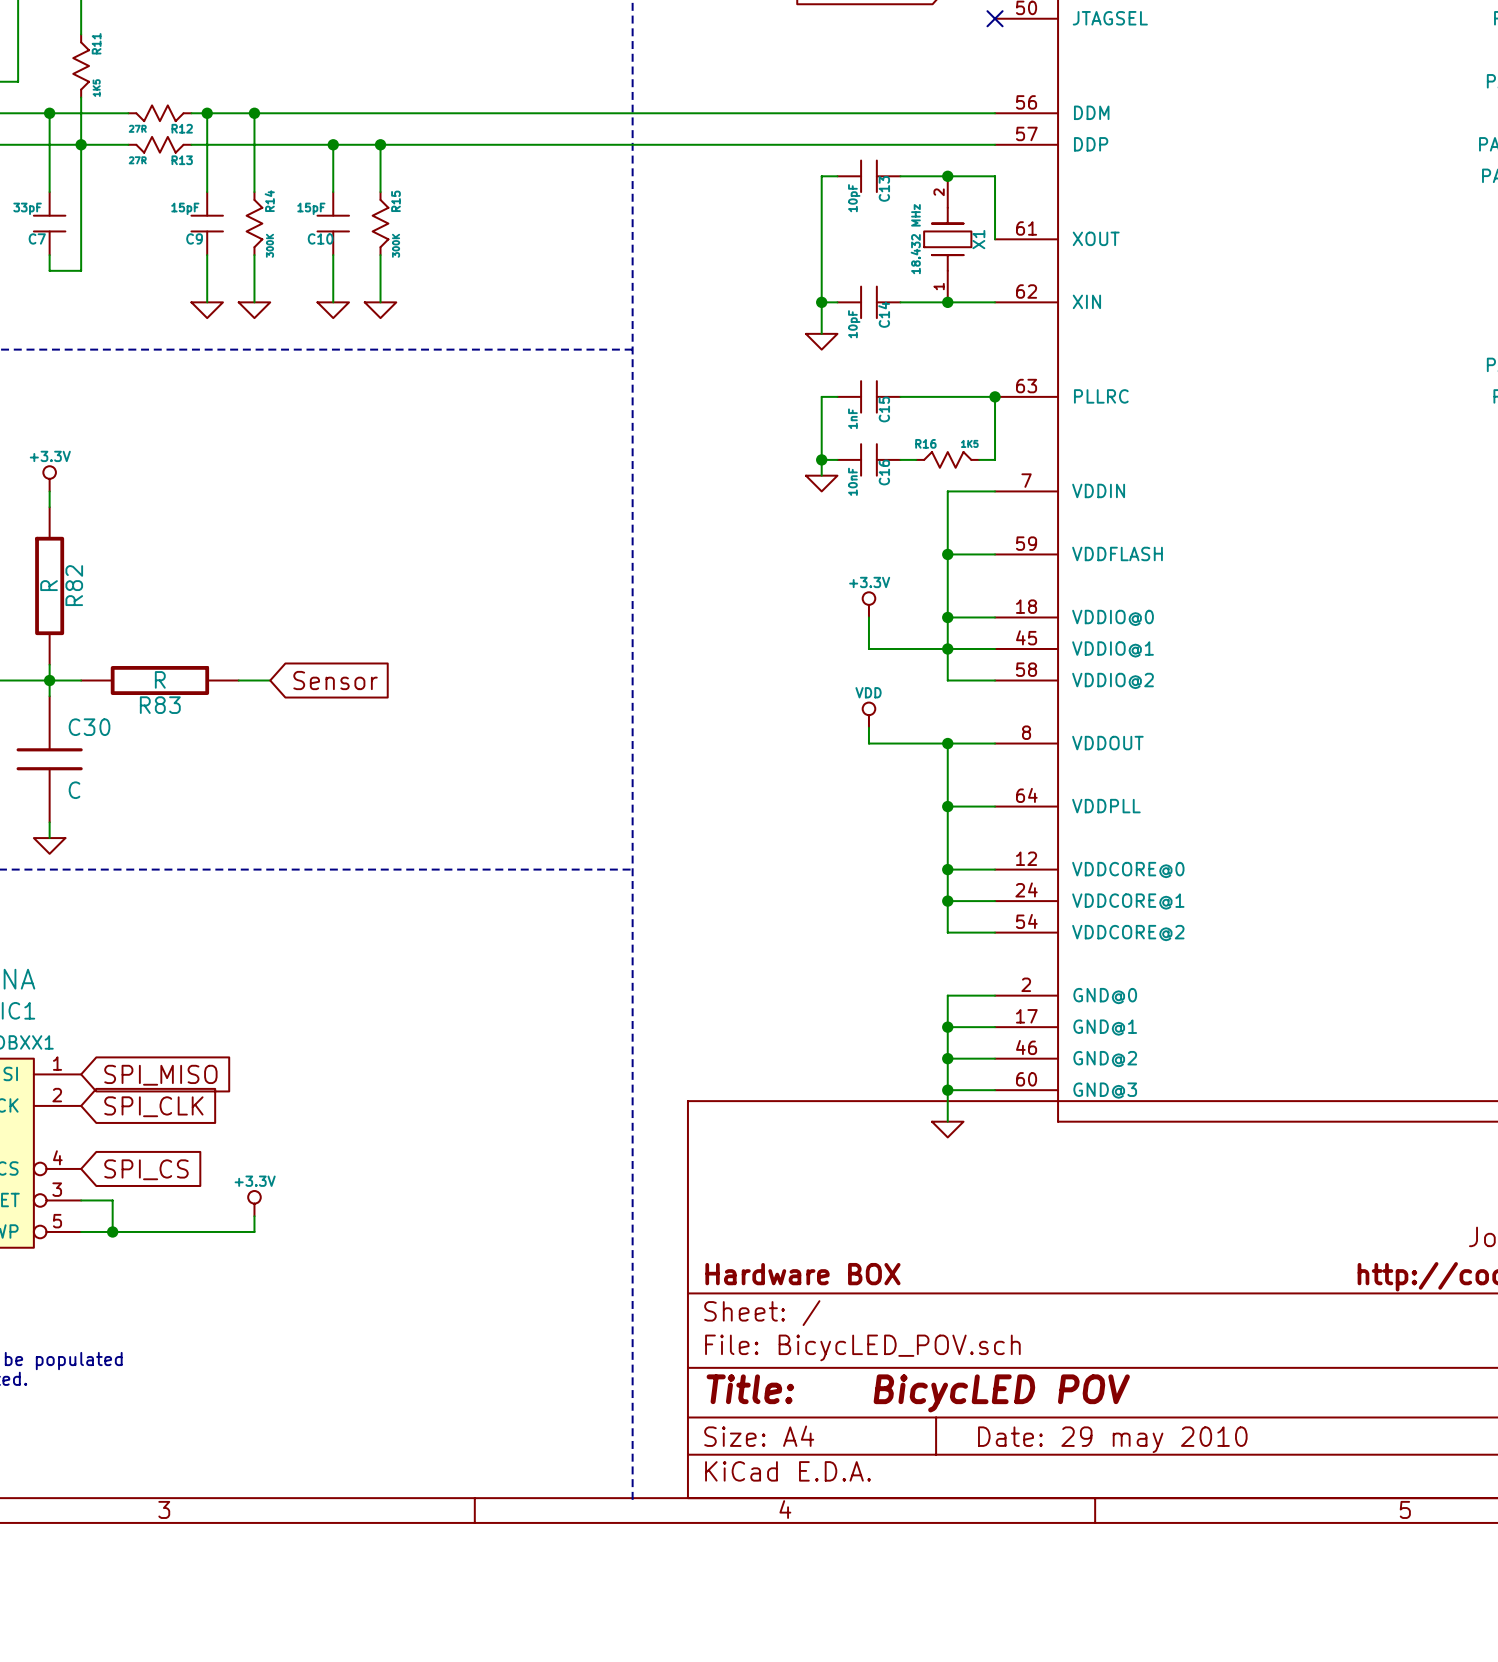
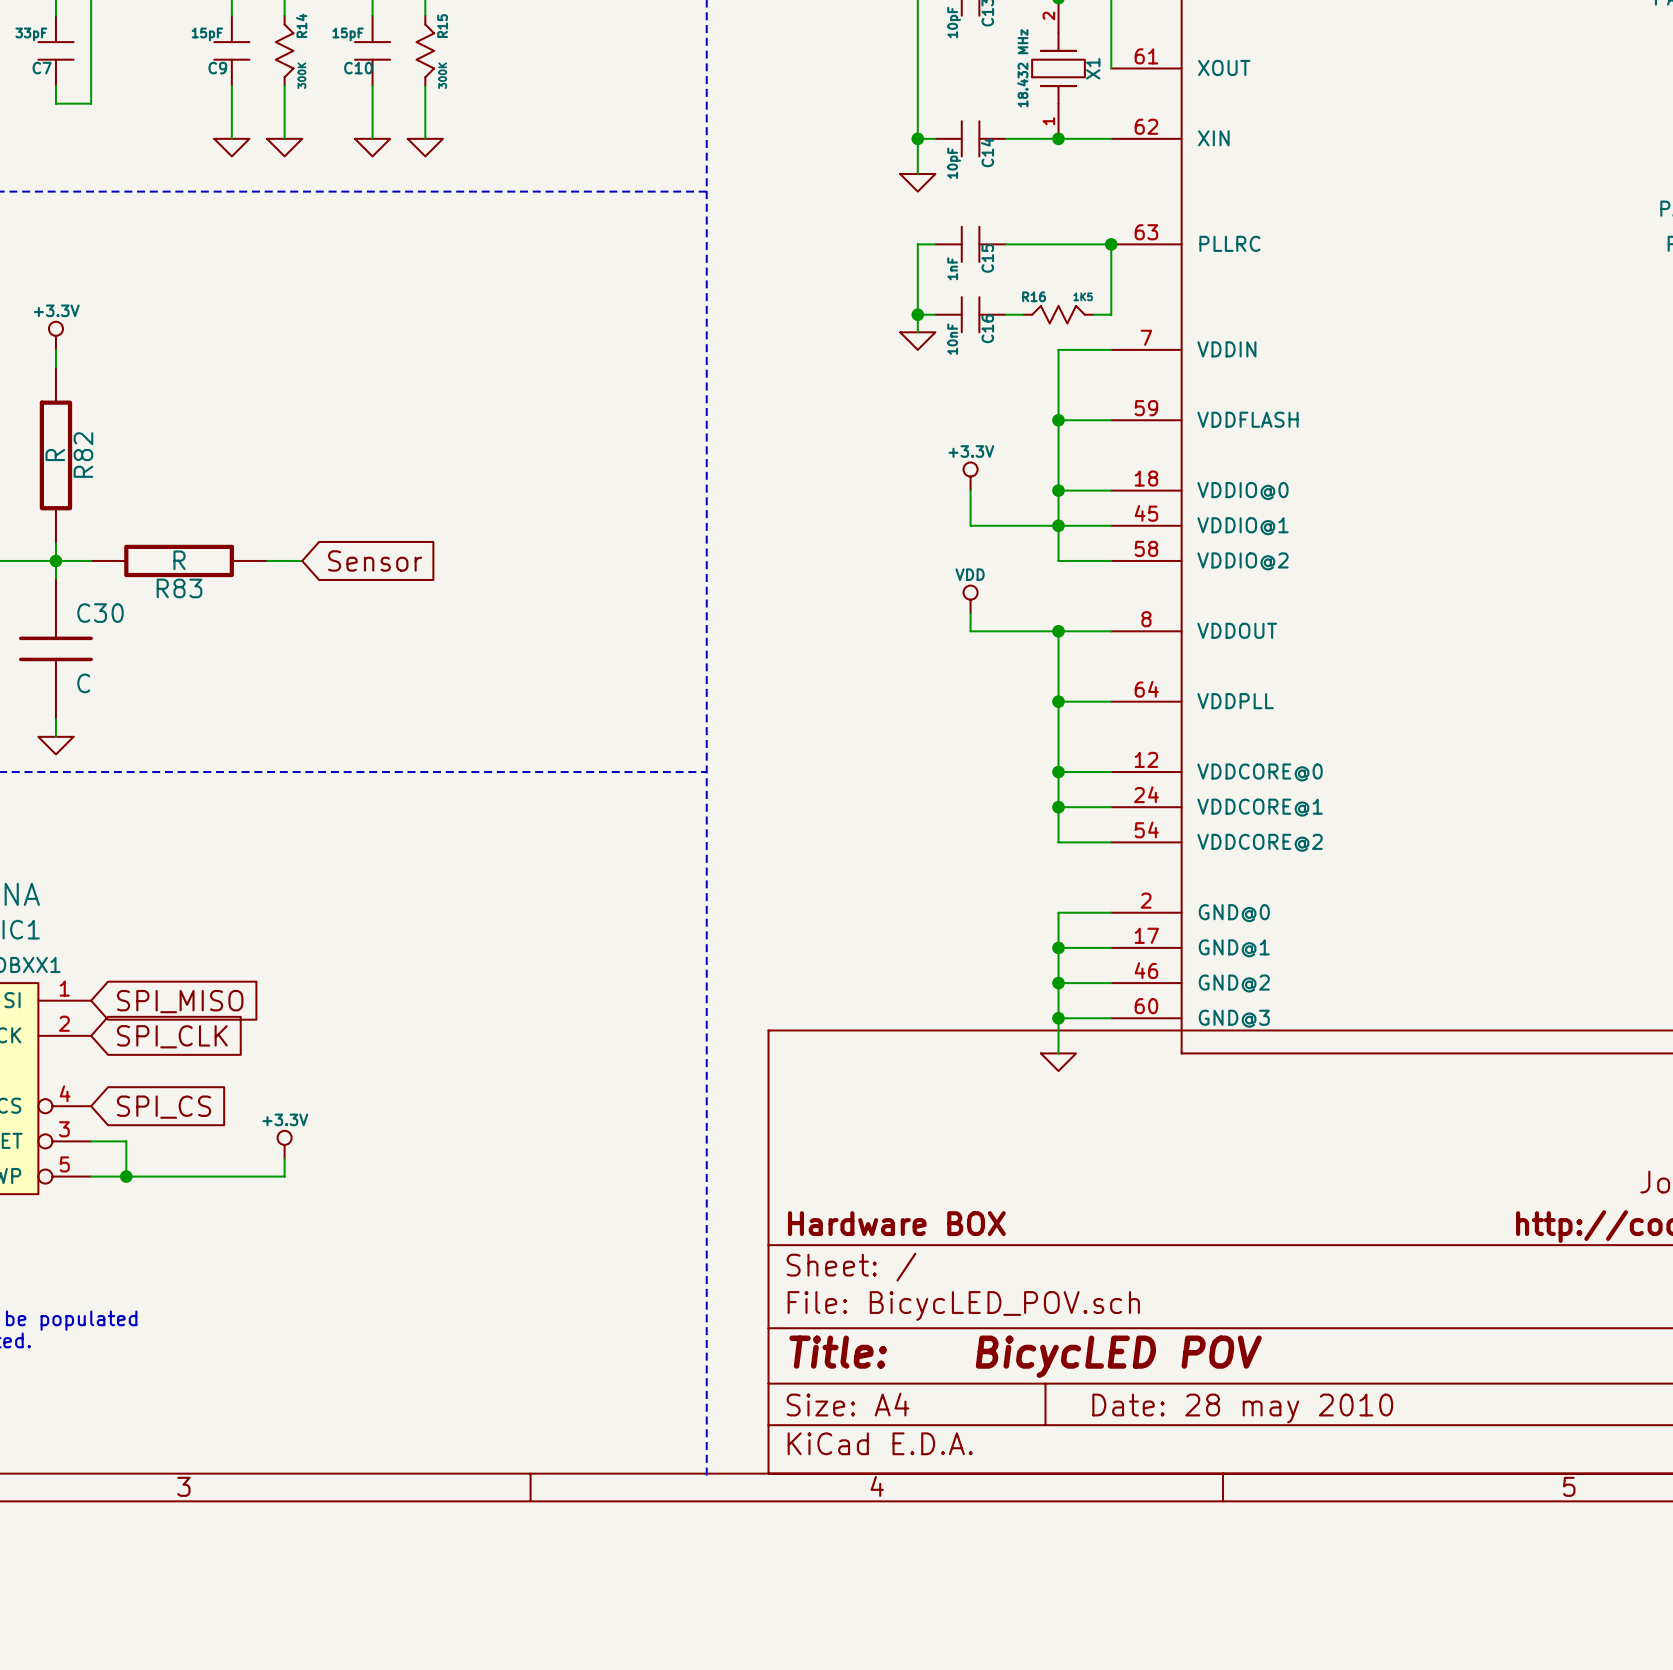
title block: Date: 29 may 2010 (1112, 1439) -> Date: 28 may 2010 (1242, 1408)

